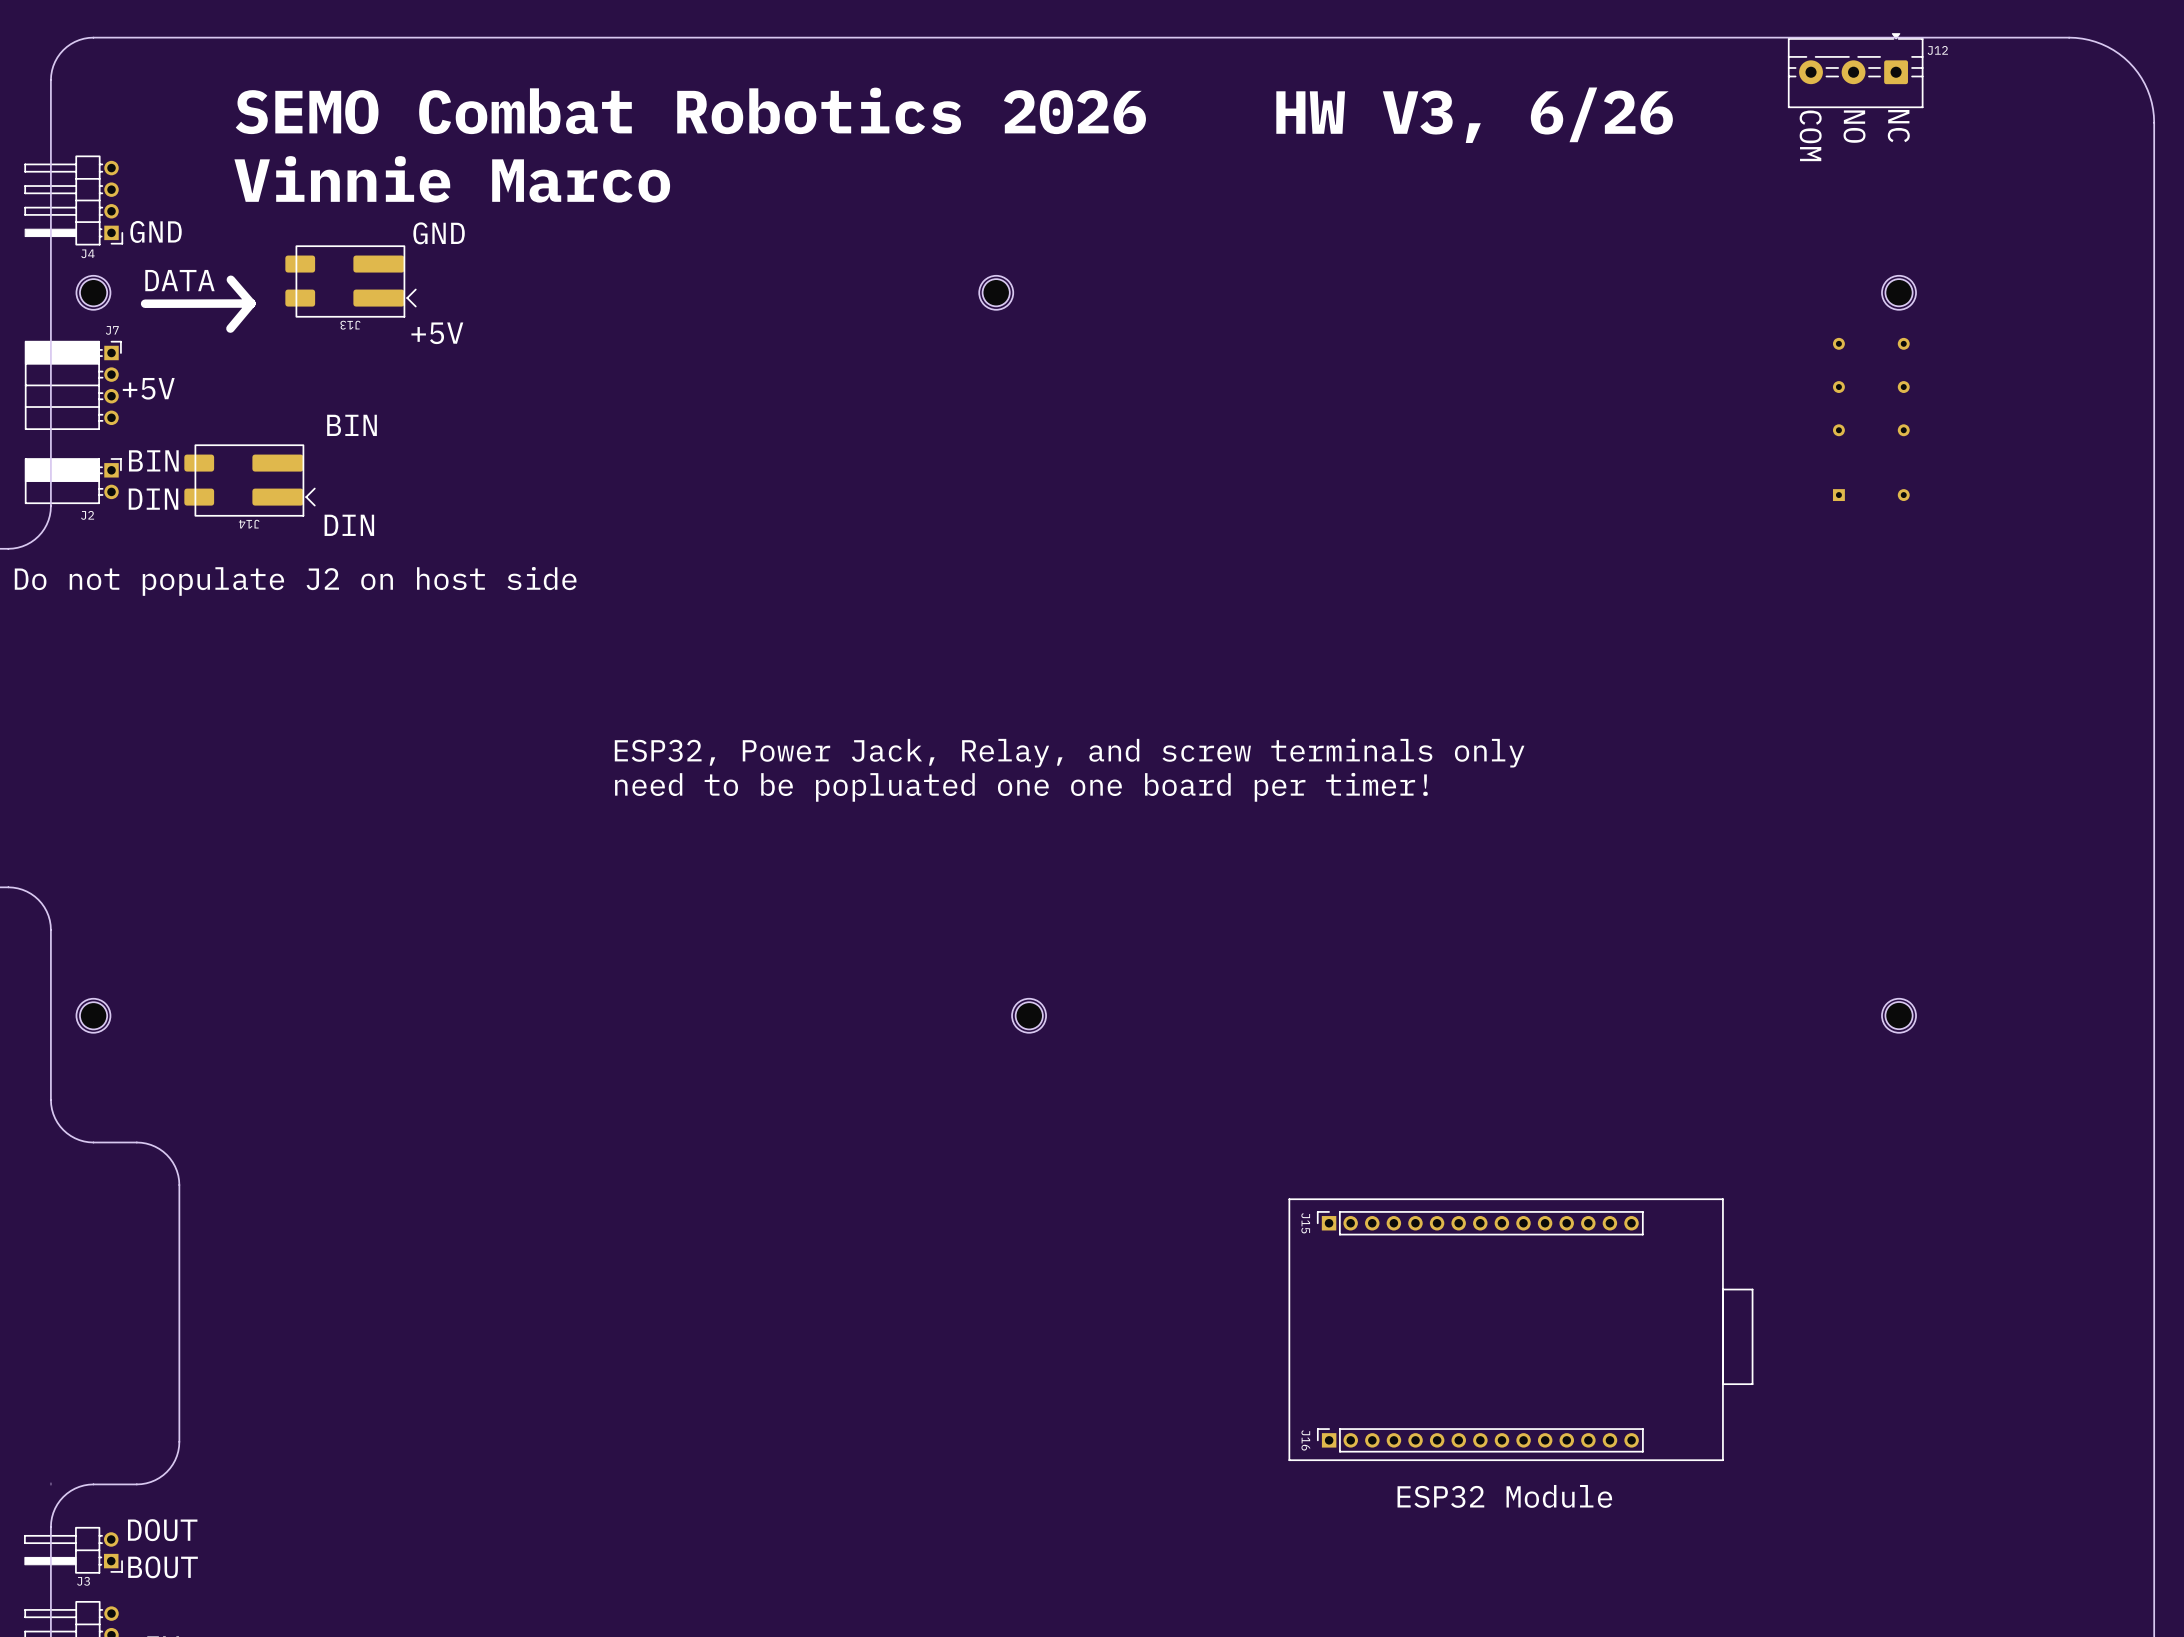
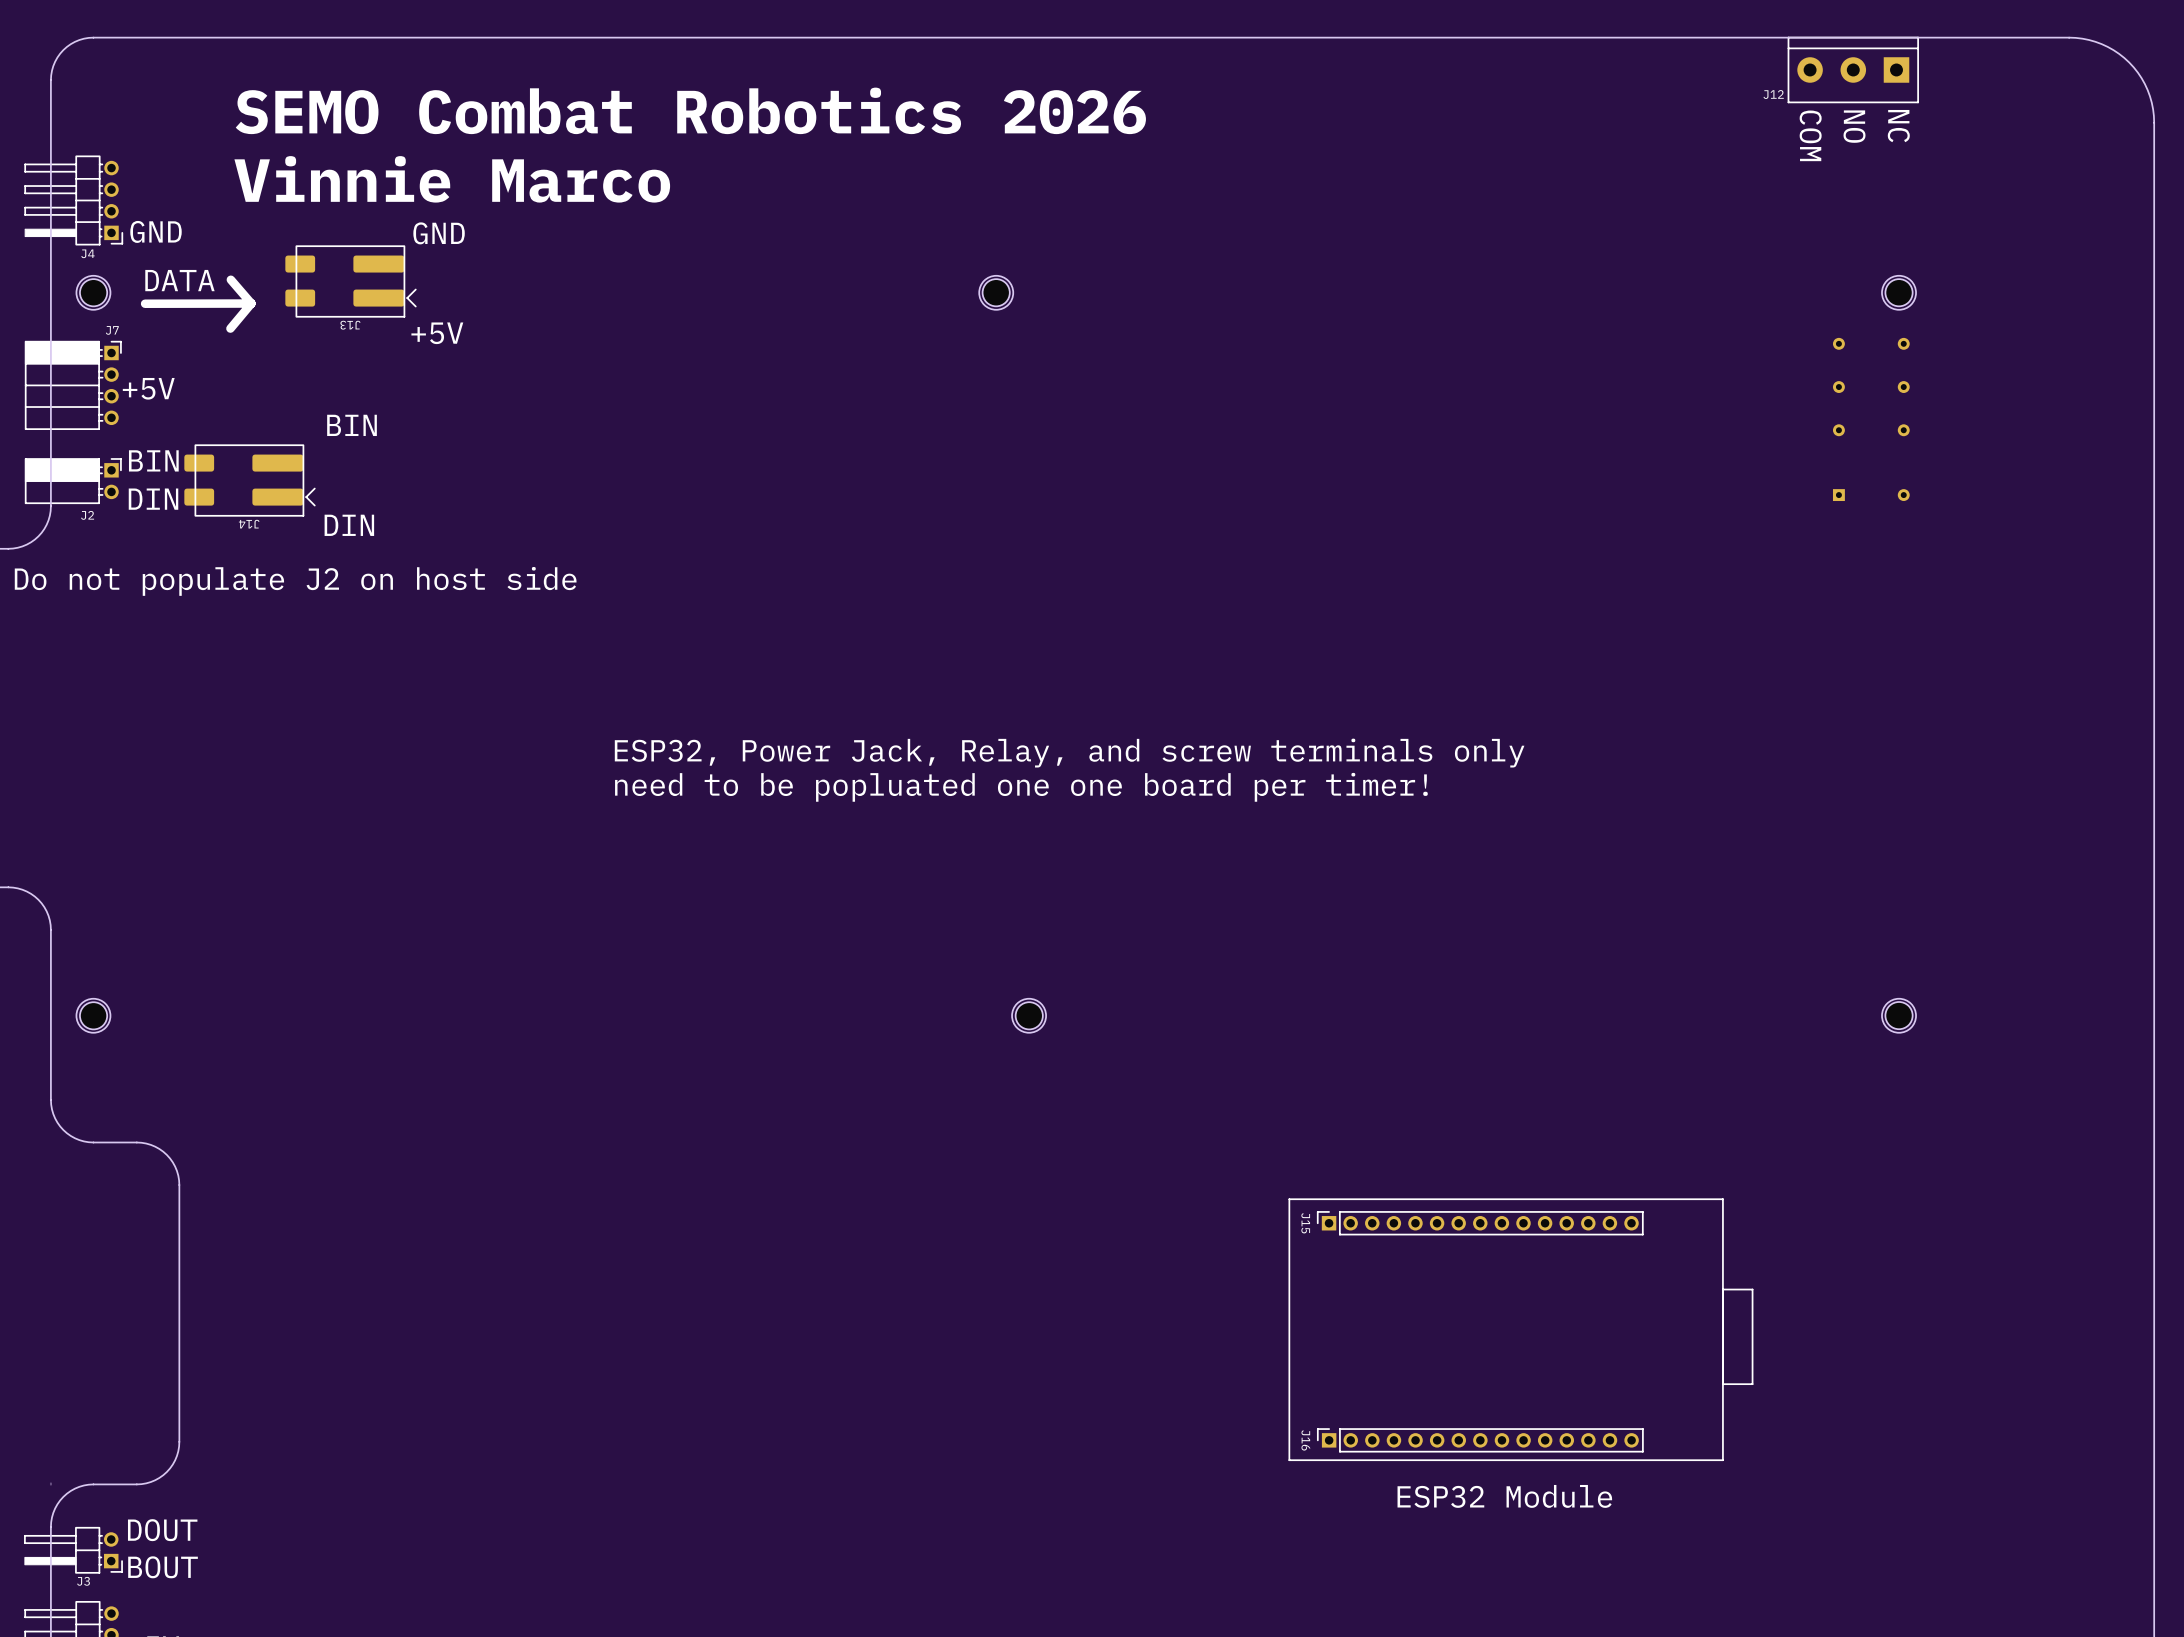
J12 footprint: [1788, 33, 1924, 108] -> [1787, 37, 1919, 103]
J12 name position: J12 (1937, 50) -> J12 (1773, 94)
text: HW V3, 6/26 (1474, 115) -> none

